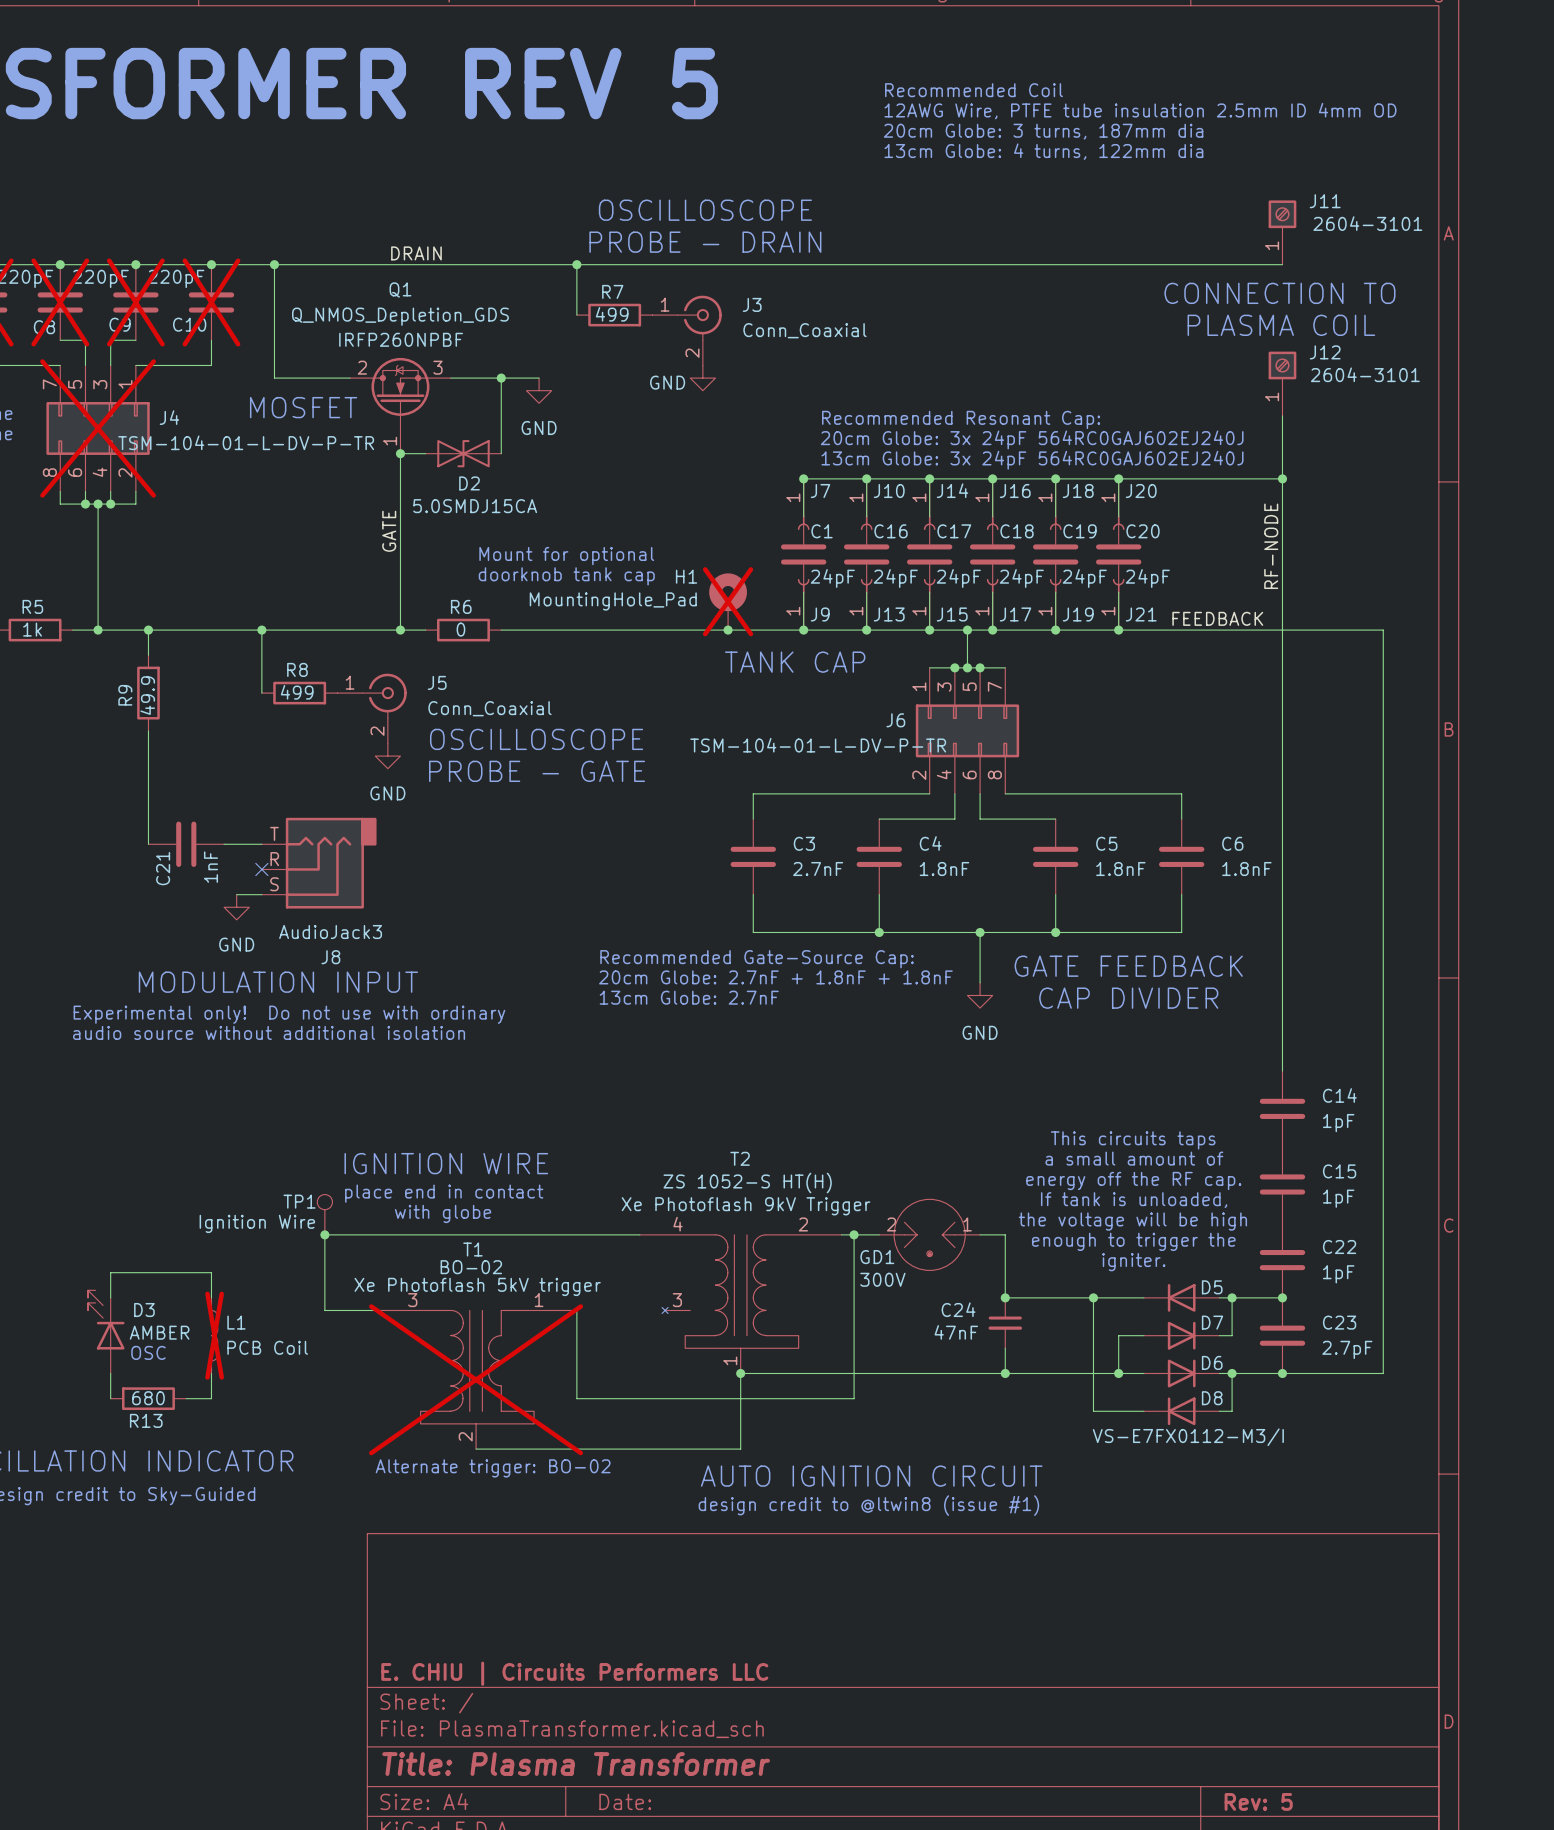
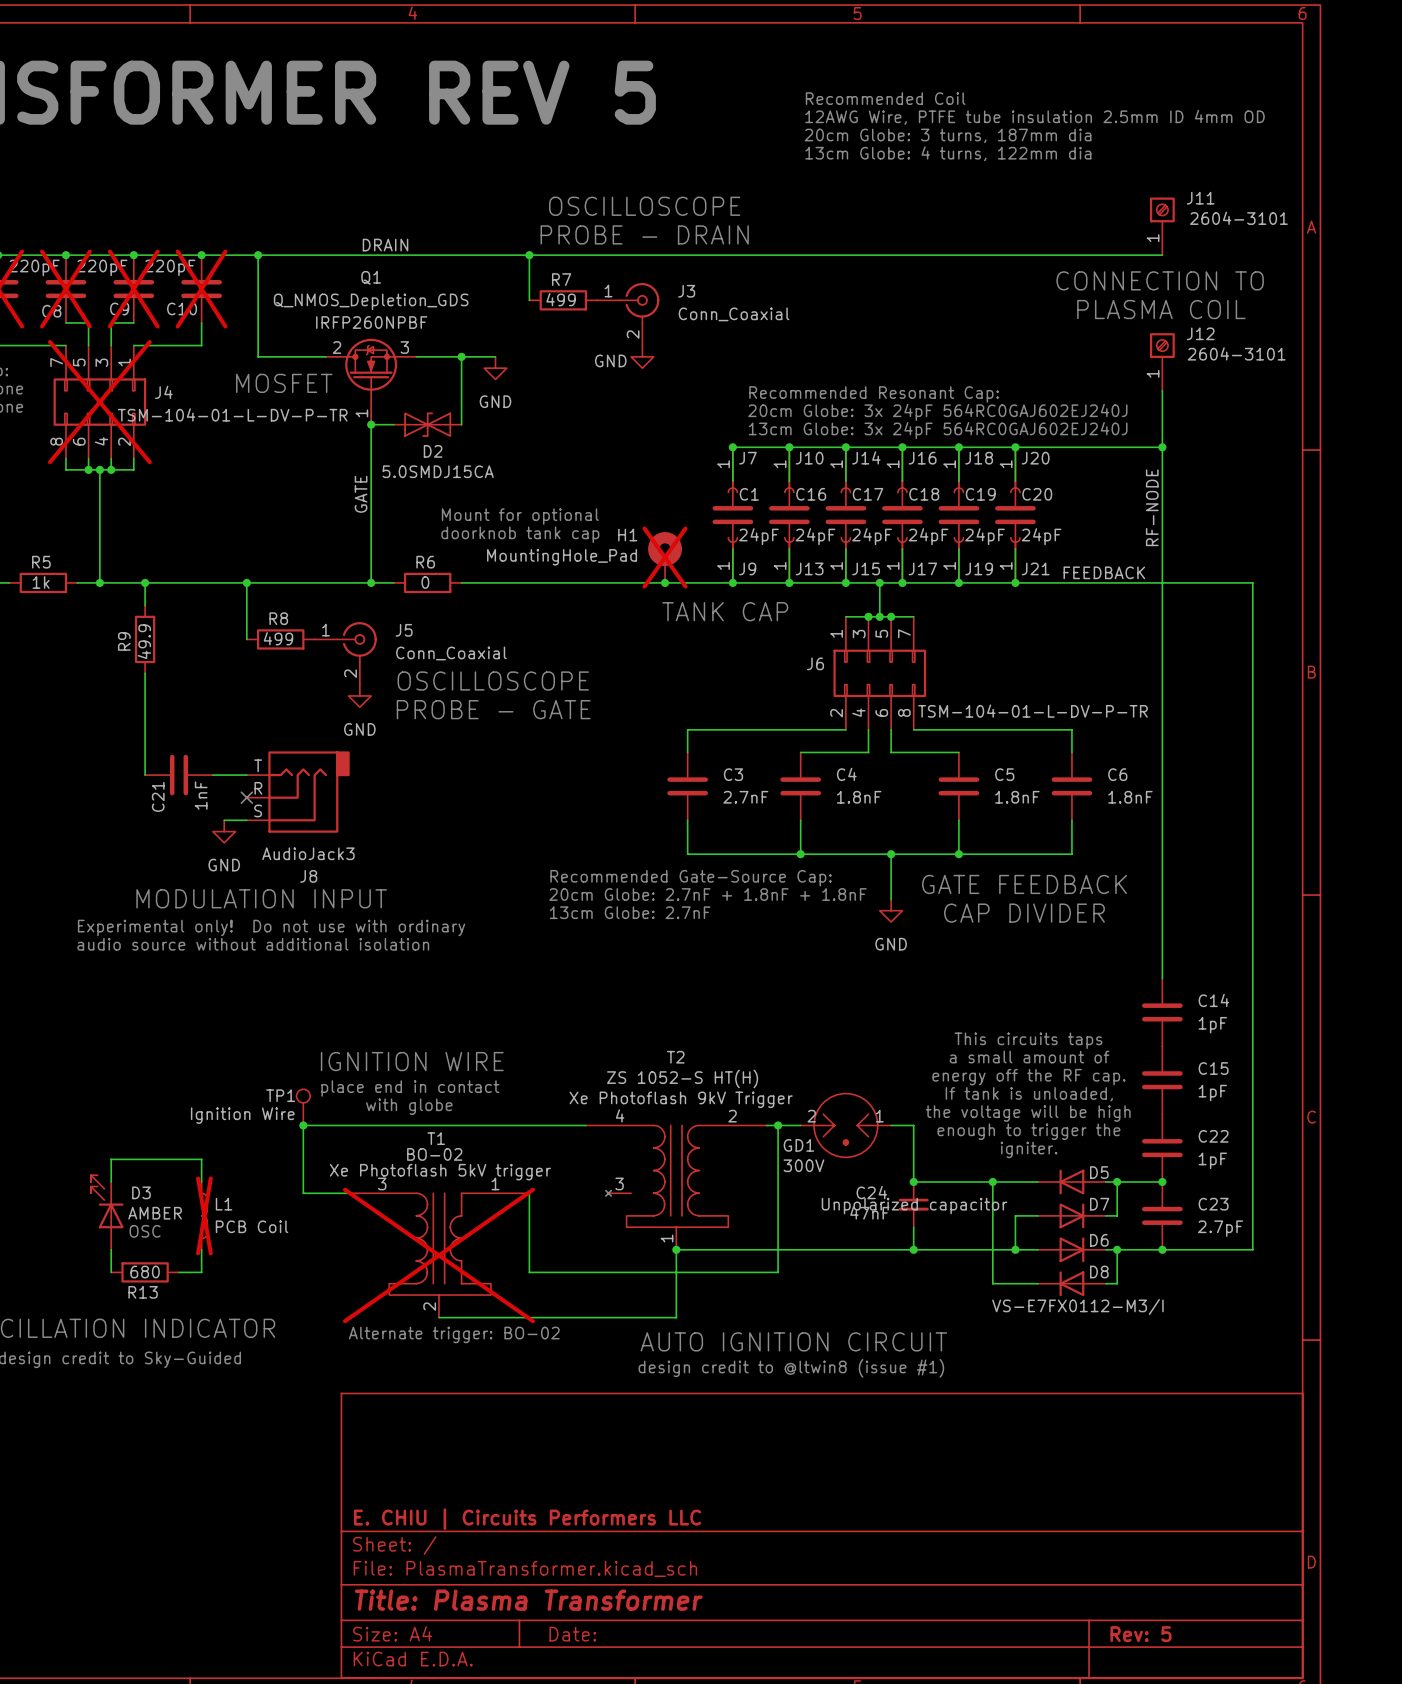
J6 text position: TSM-104-01-L-DV-P-TR (818, 745) -> TSM-104-01-L-DV-P-TR (1032, 711)
C24 text: none -> Unpolarized capacitor (914, 1206)

